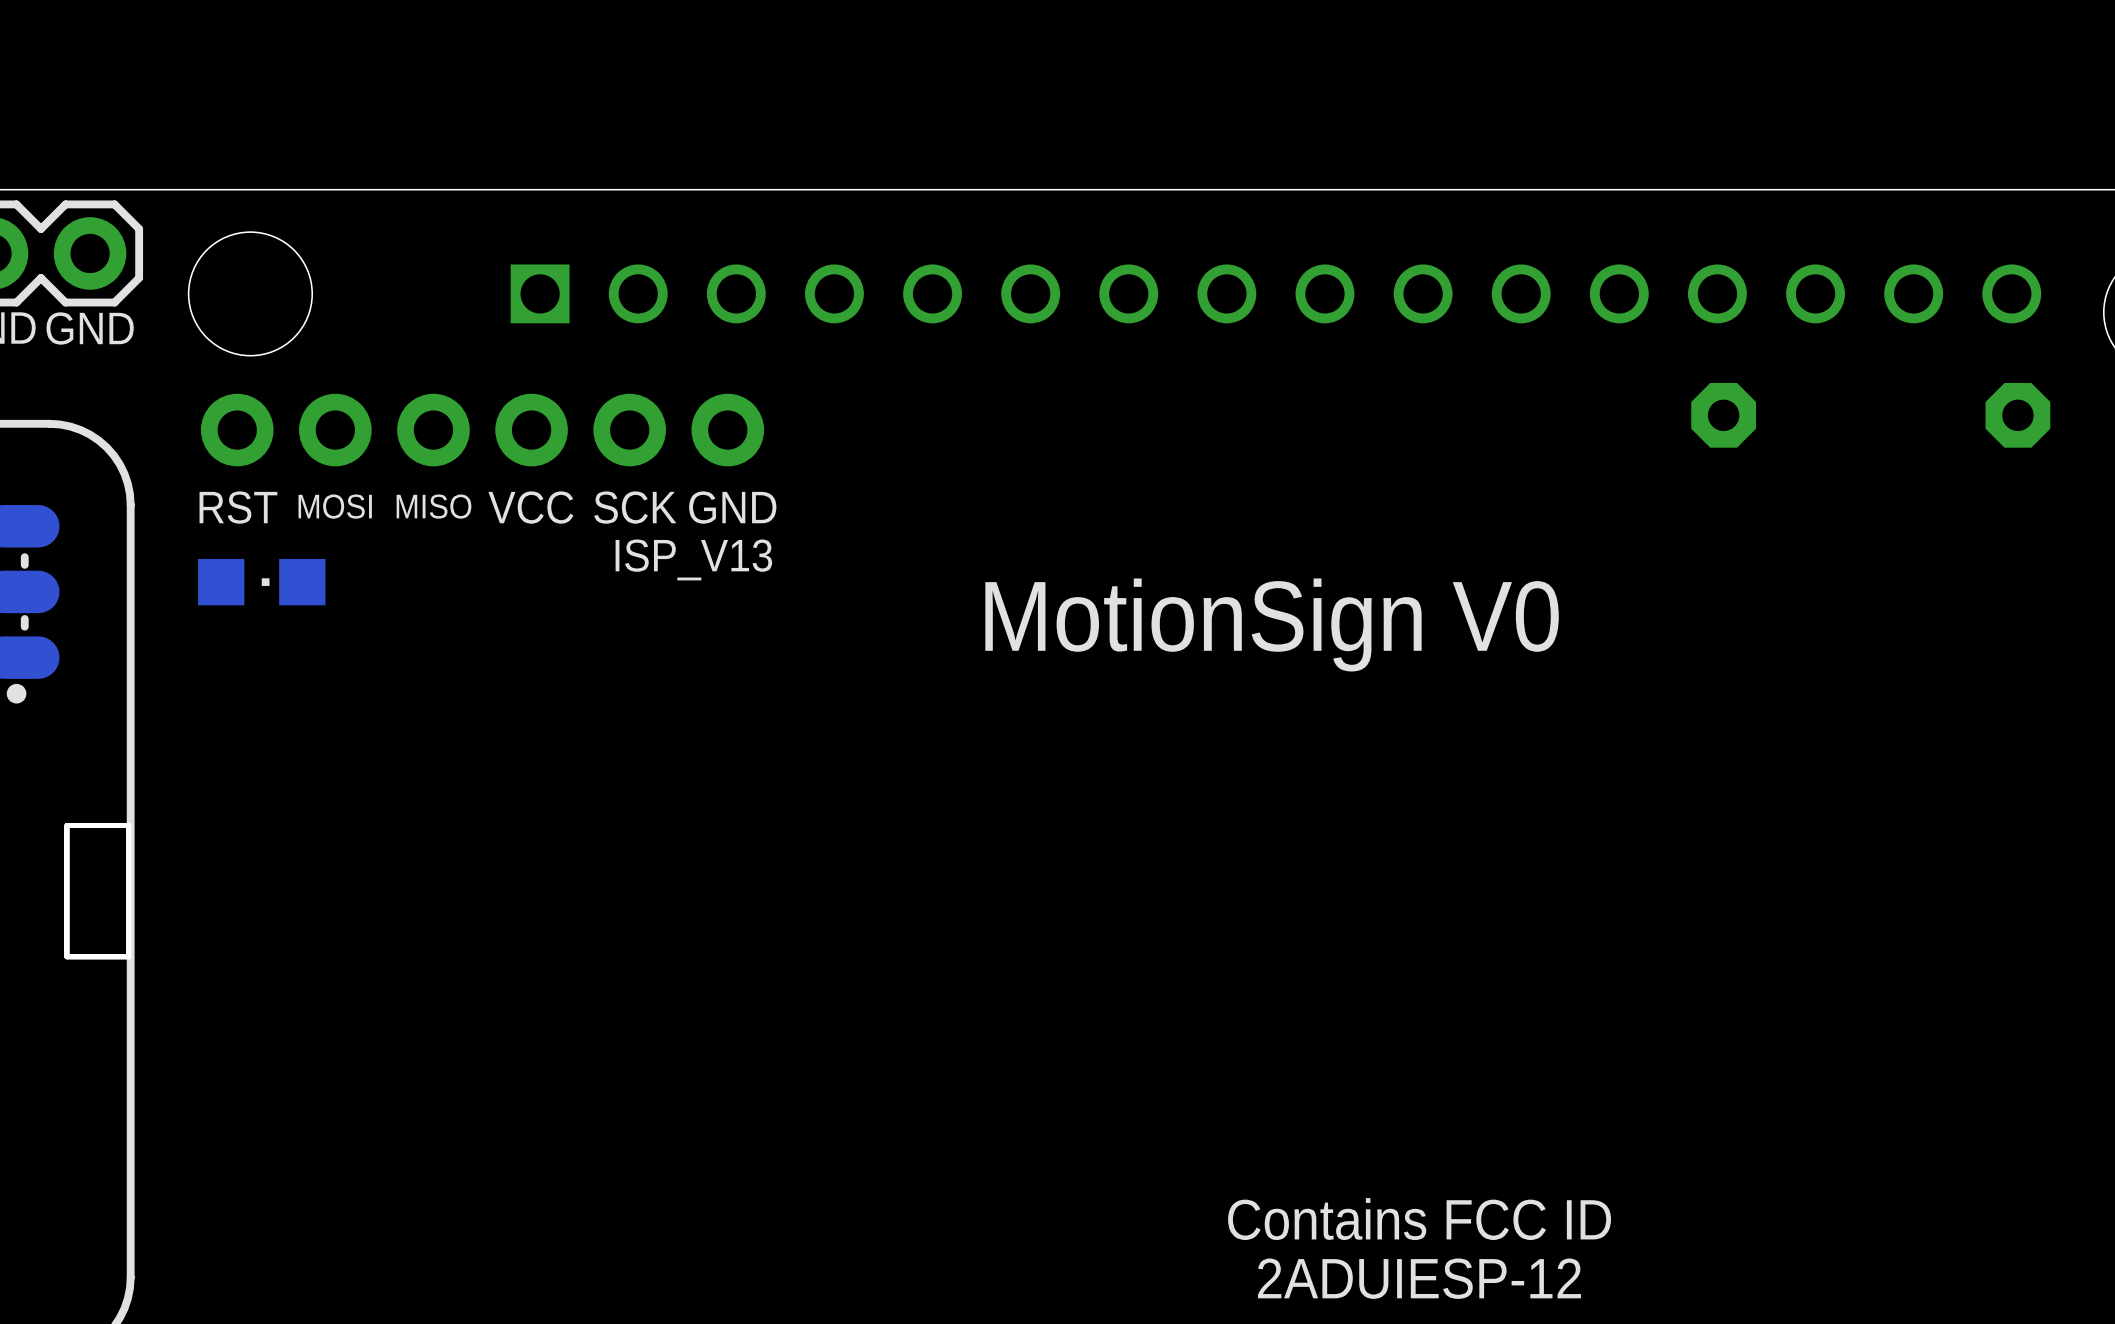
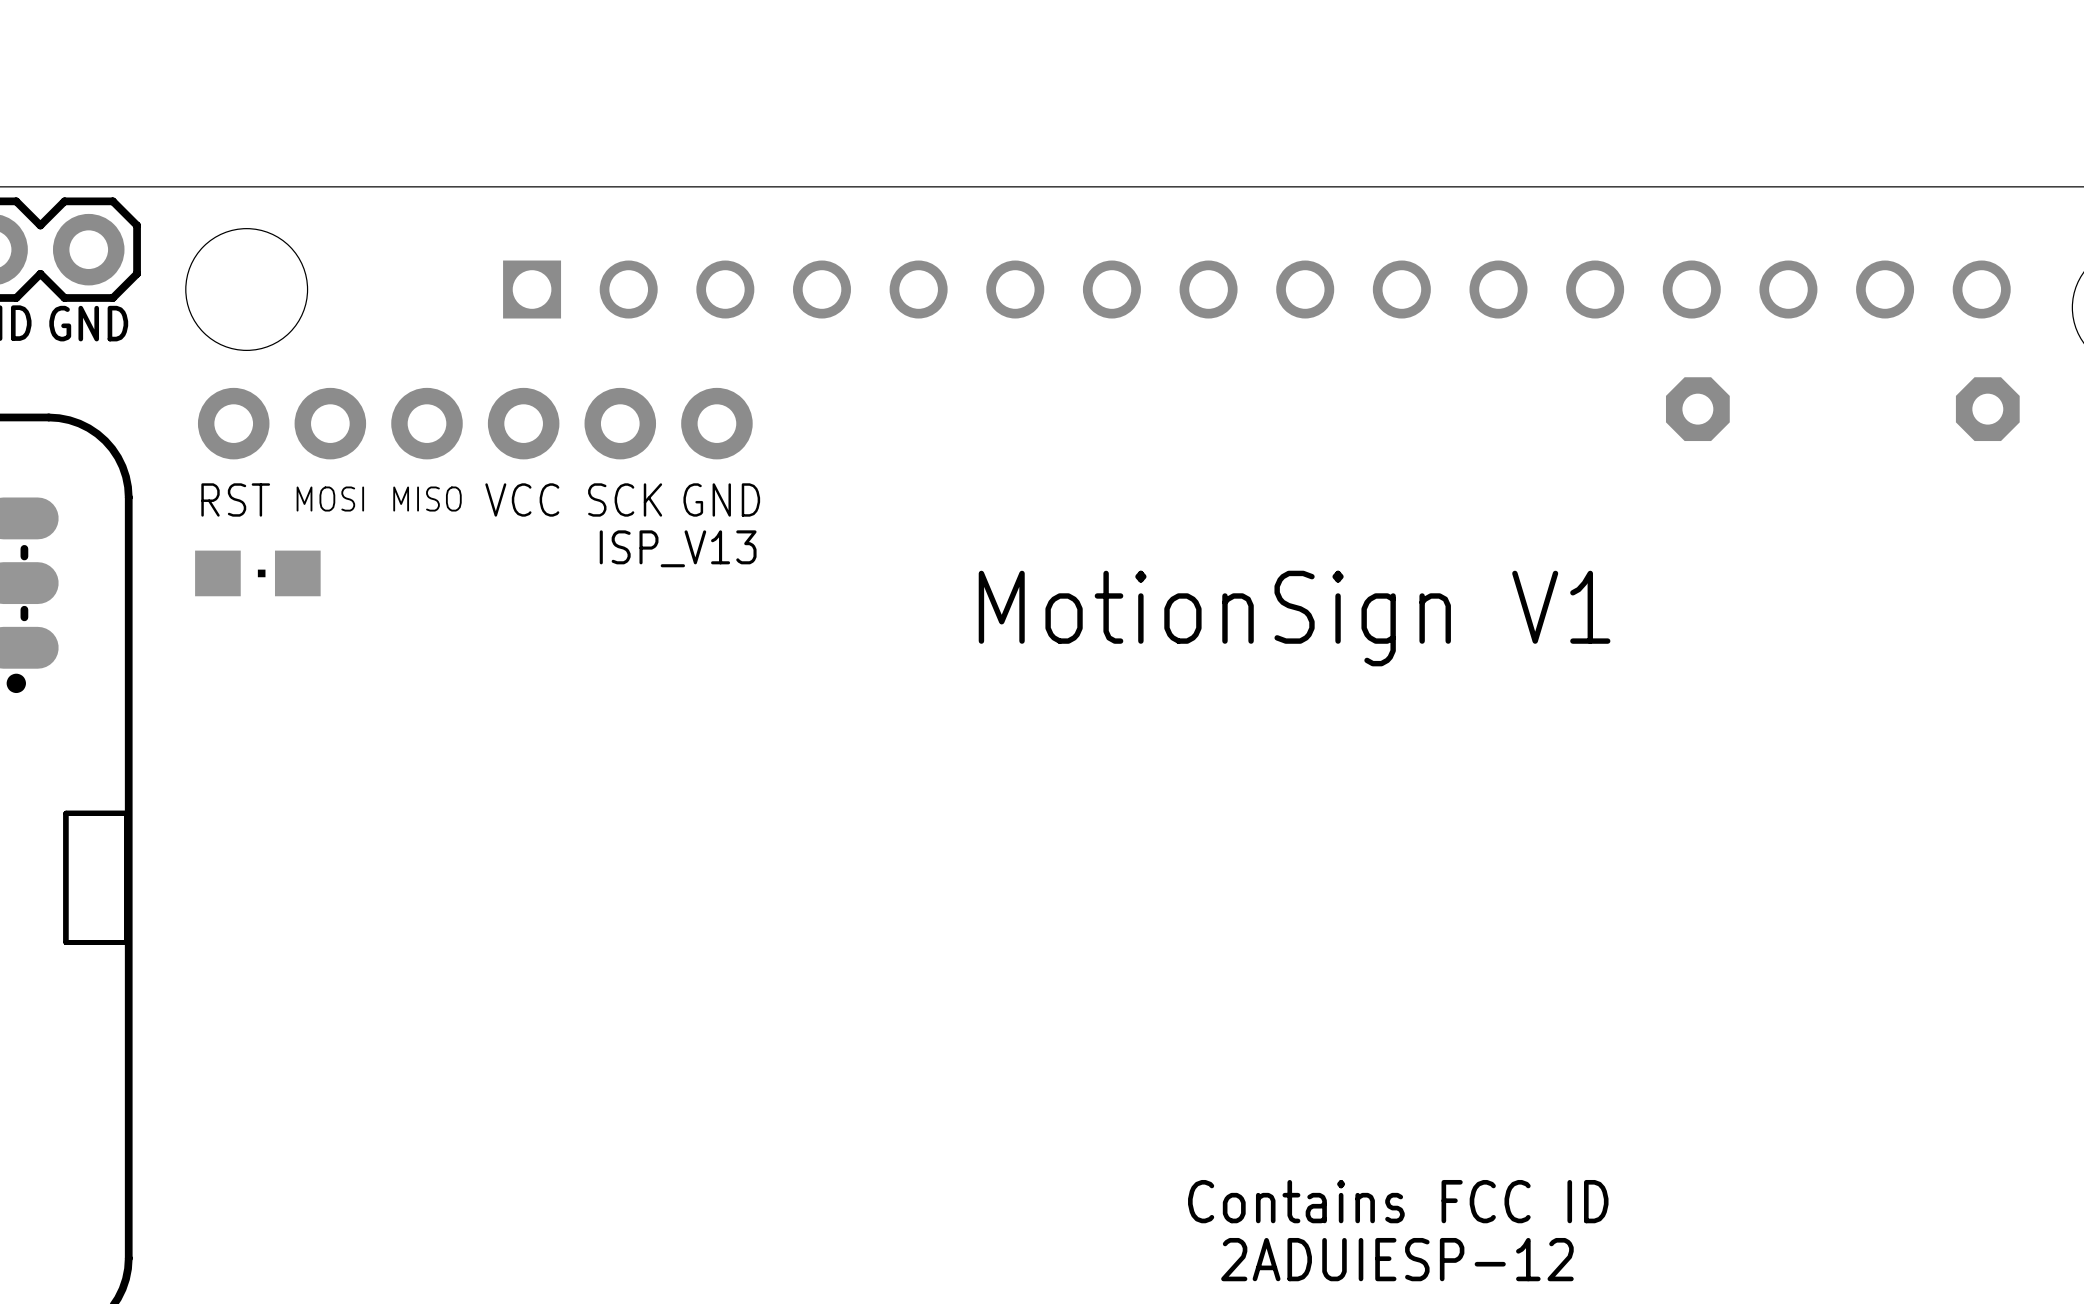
text: MotionSign V0 (1272, 624) -> MotionSign V1 (1294, 618)

